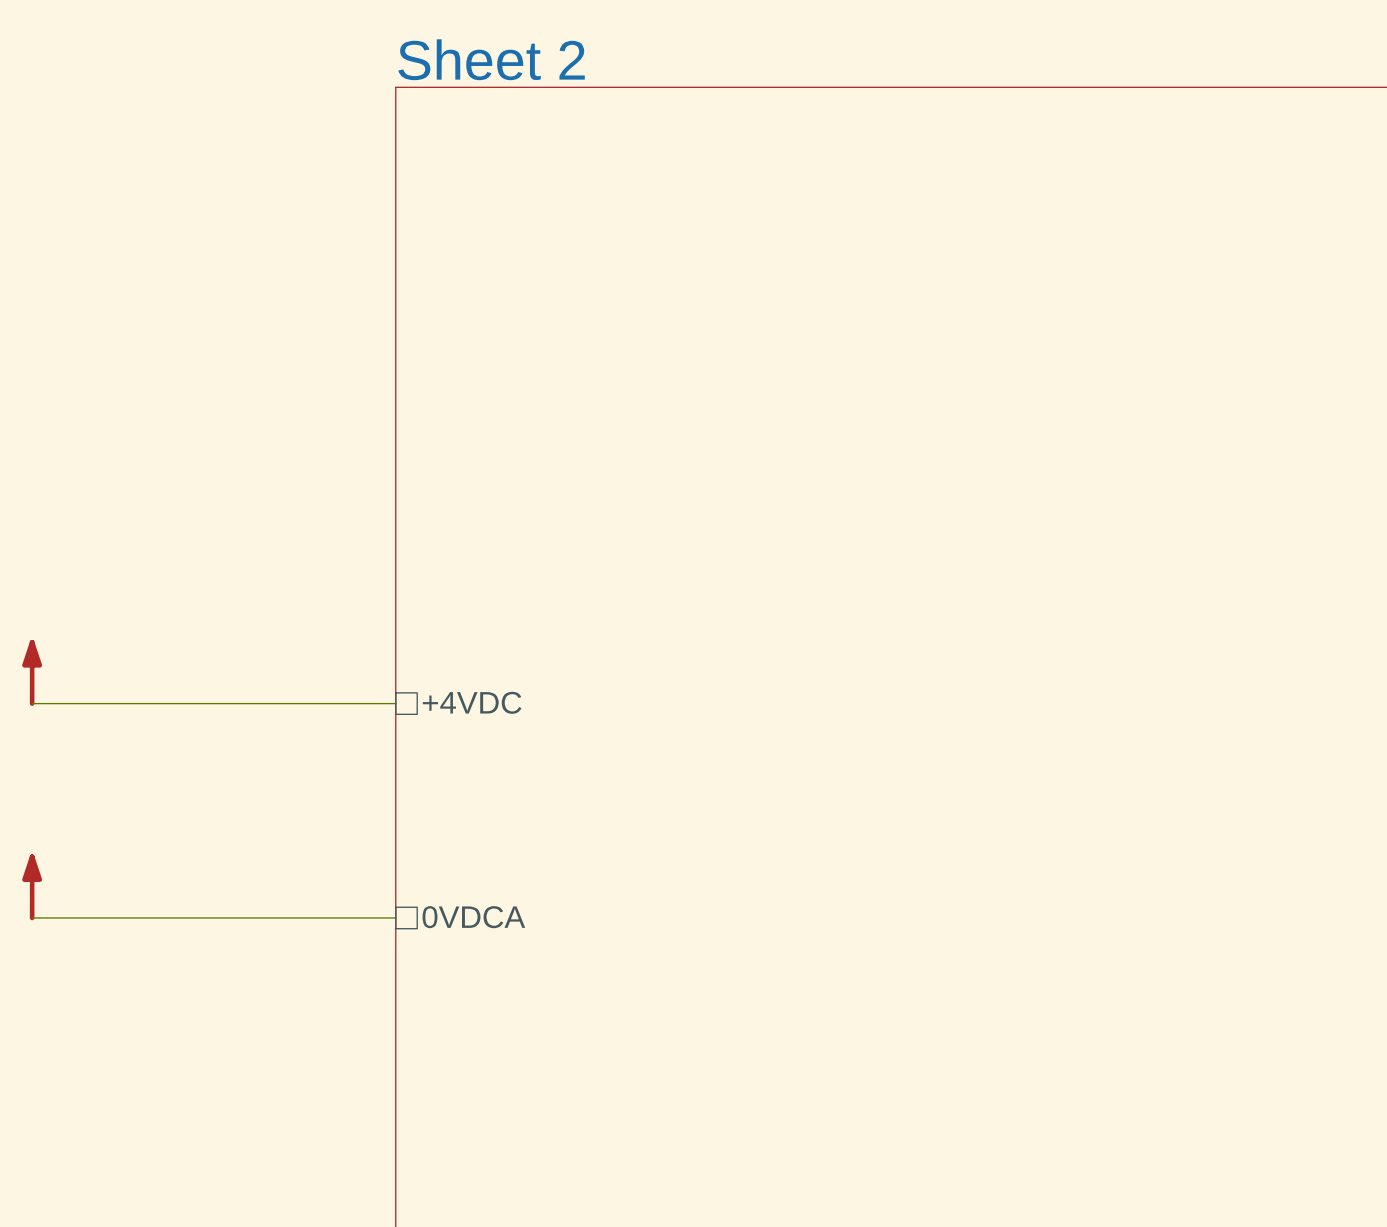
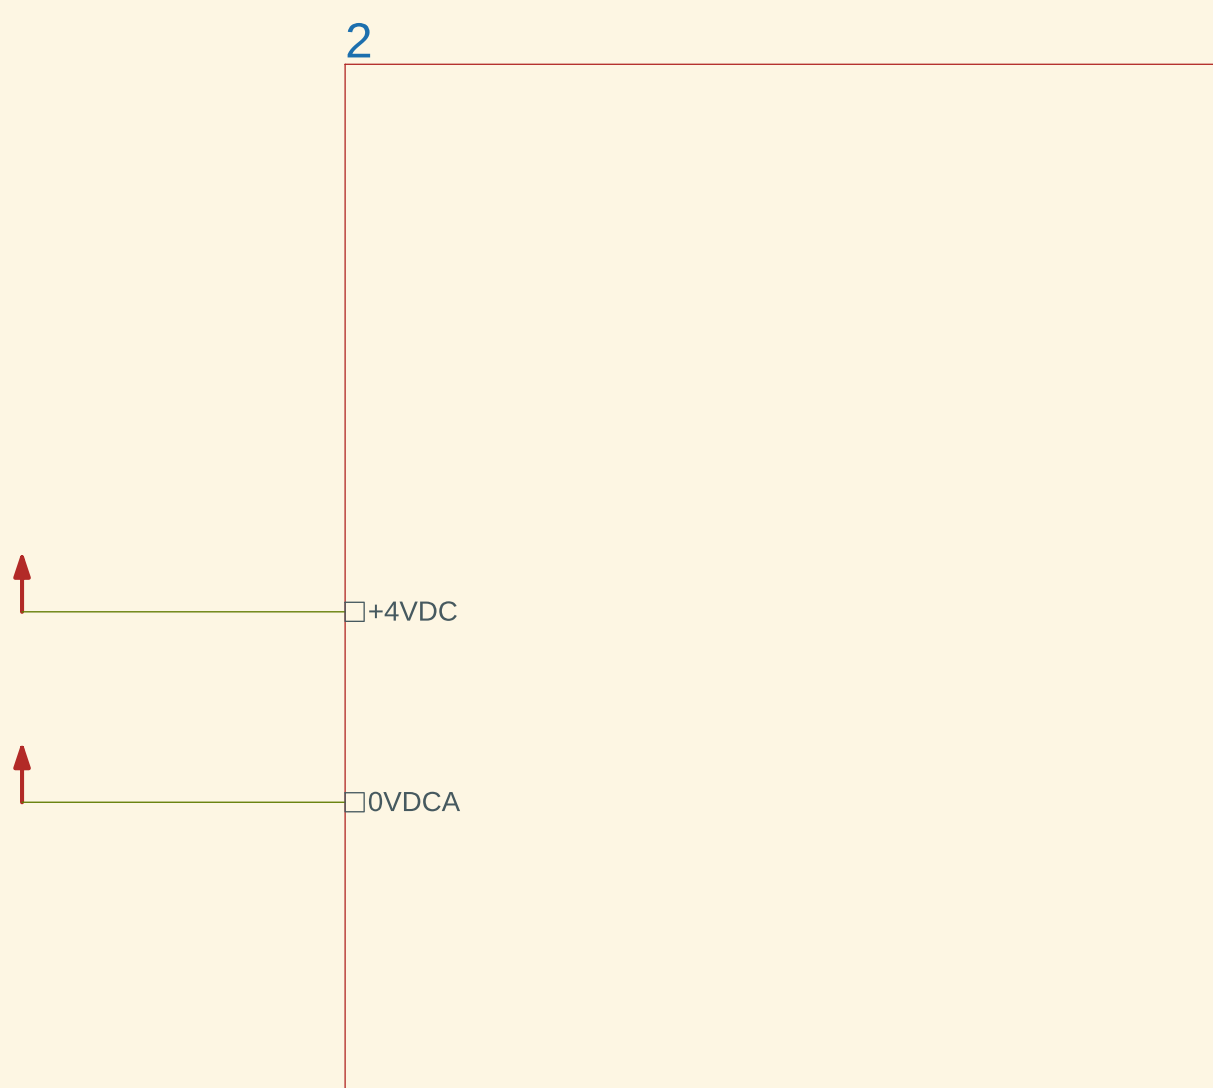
sheet Sheet 2 name: Sheet 2 (491, 59) -> 2 (358, 40)

